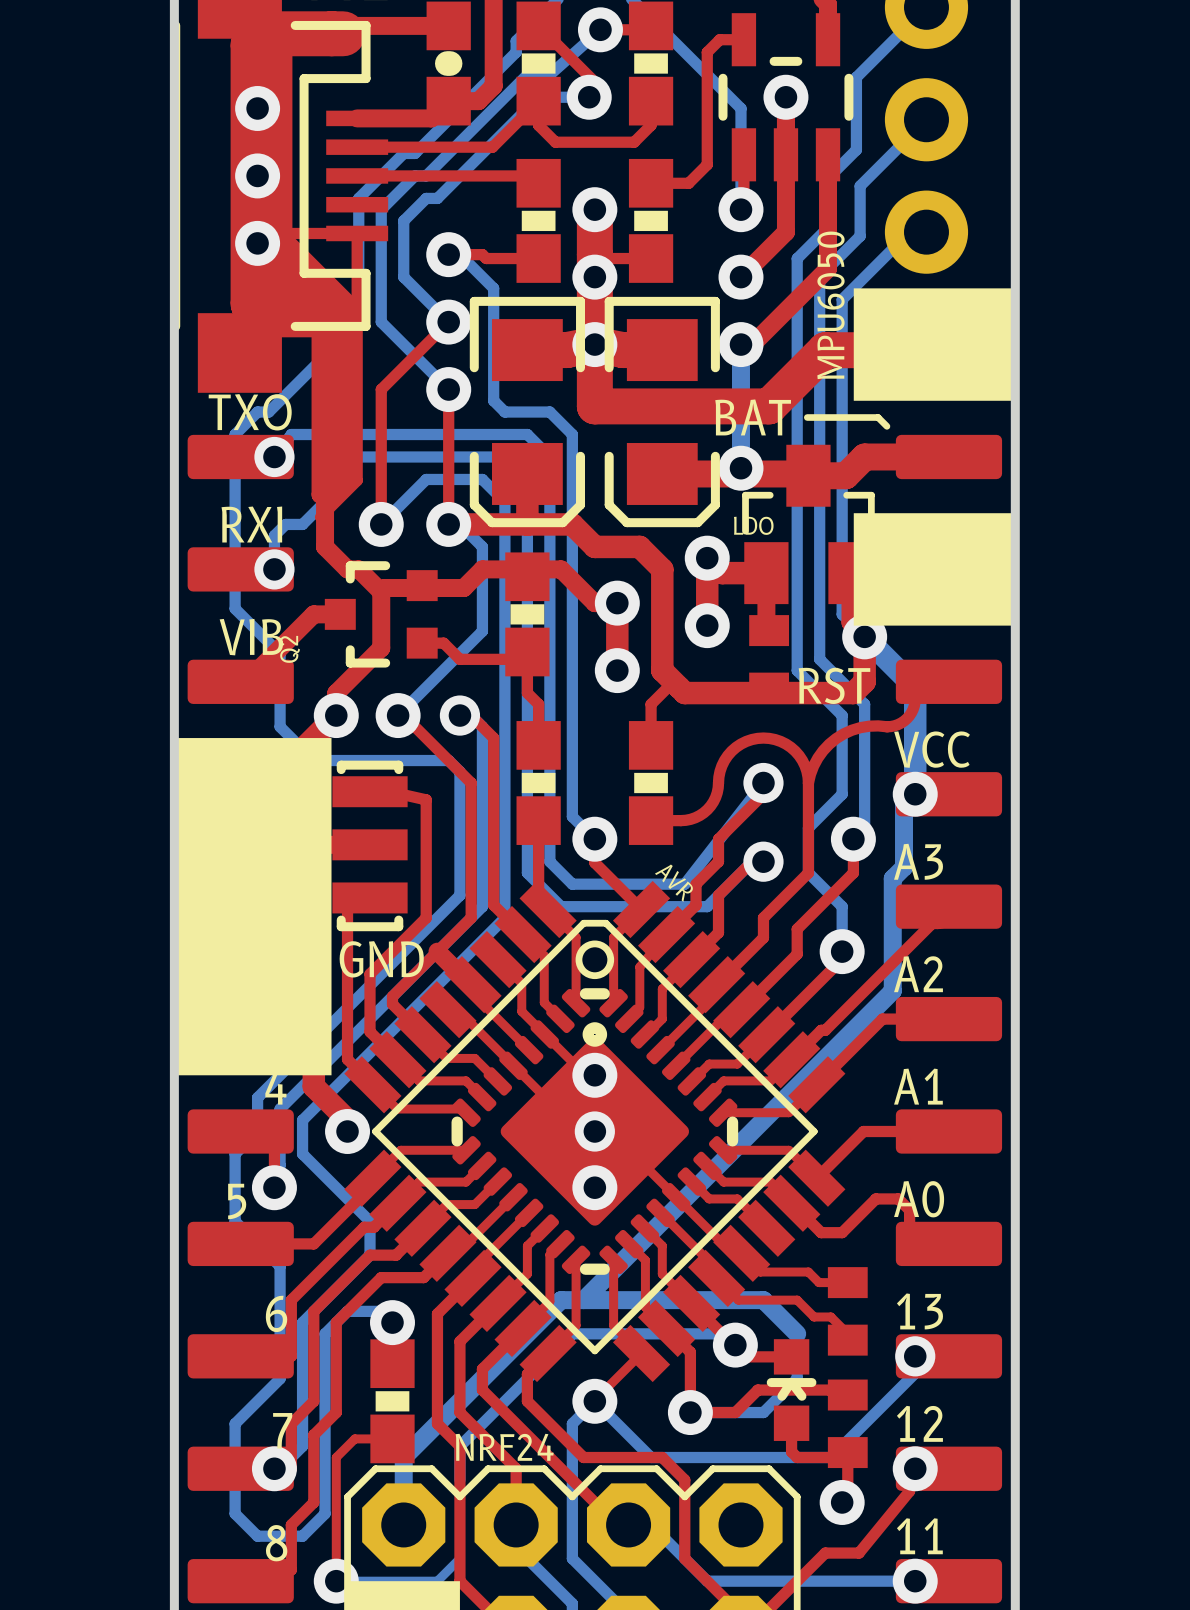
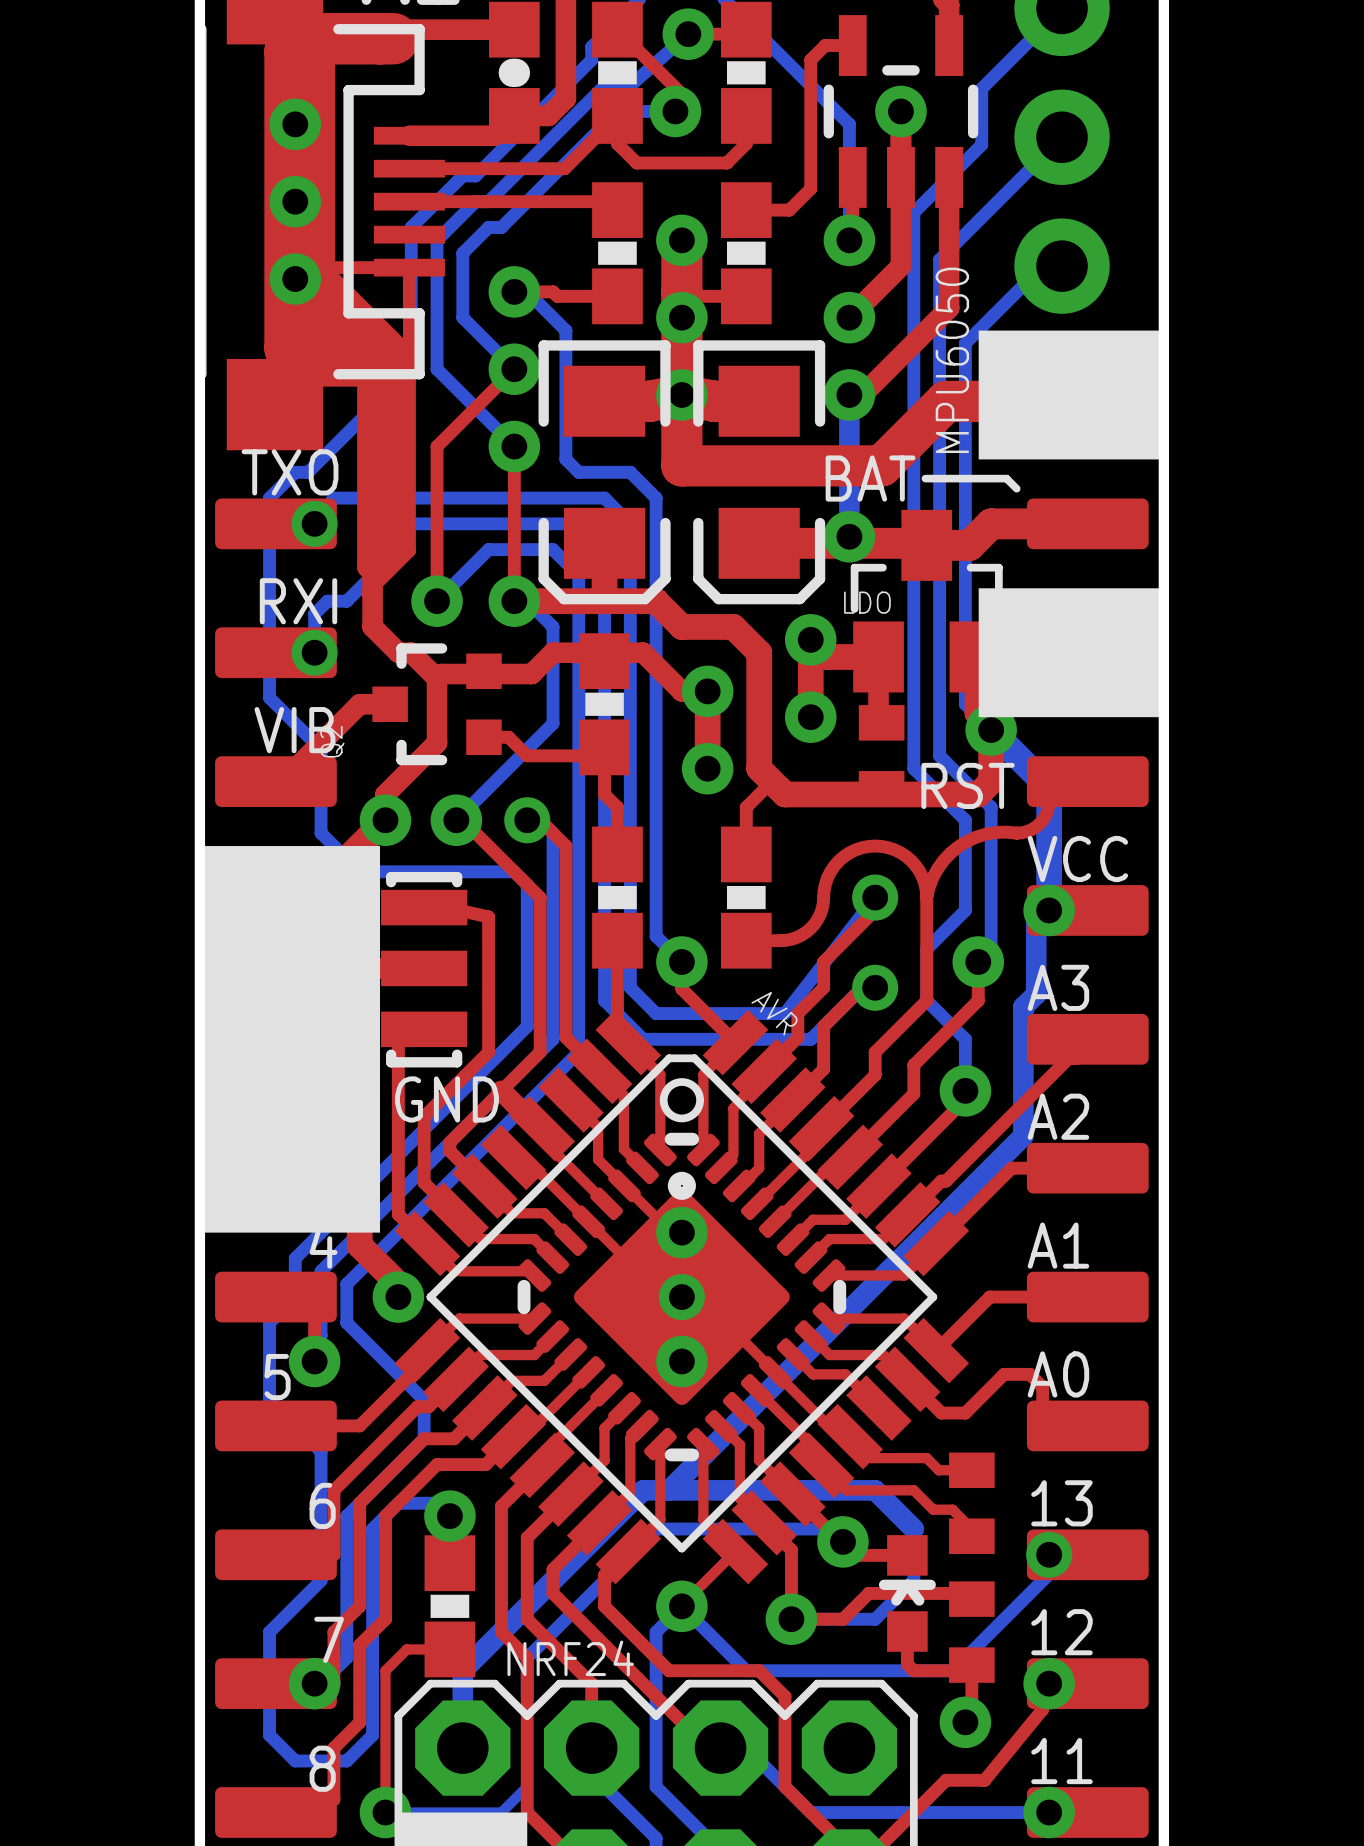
bottom track: (856, 126) (856, 149) (829, 176) (829, 226) (797, 258) -> (981, 144) (913, 212) (913, 296)
bottom track: (860, 186) (860, 236) (819, 276) -> (985, 213) (939, 259) (939, 317)

